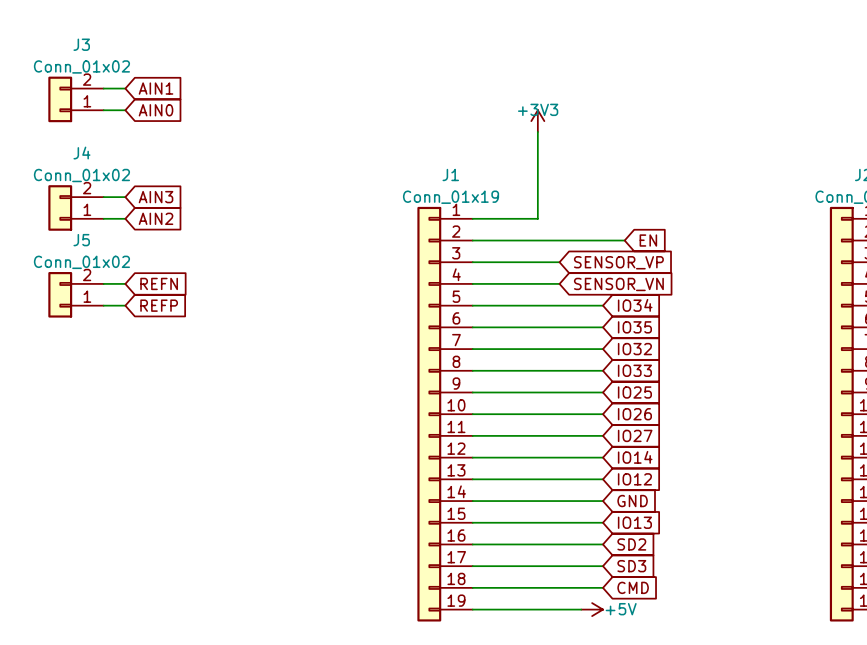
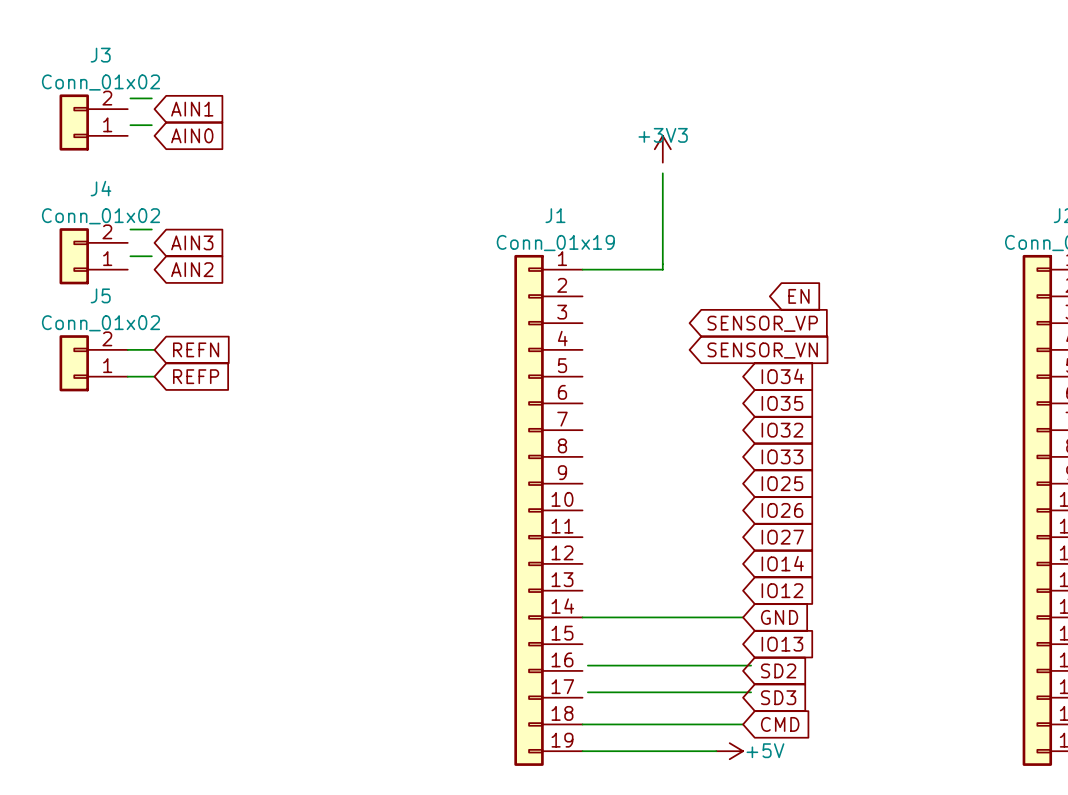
wire: none -> (130, 98) (151, 98)
wire: (103, 88) (125, 88) -> none
wire: none -> (130, 125) (151, 125)
wire: (103, 110) (125, 110) -> none
wire: (537, 131) (537, 140) -> none
wire: none -> (130, 229) (151, 229)
wire: (103, 197) (125, 197) -> none
wire: none -> (130, 256) (151, 256)
wire: (103, 218) (125, 218) -> none
wire: (472, 240) (624, 240) -> none
wire: (472, 262) (559, 262) -> none
wire: (472, 283) (559, 283) -> none
wire: (472, 305) (602, 305) -> none
wire: (472, 327) (602, 327) -> none
wire: (472, 349) (602, 349) -> none
wire: (472, 370) (602, 370) -> none
wire: (472, 392) (602, 392) -> none
wire: (472, 414) (602, 414) -> none
wire: (472, 435) (602, 435) -> none
wire: (472, 457) (602, 457) -> none
wire: (472, 479) (602, 479) -> none
wire: (472, 522) (602, 522) -> none
wire: none -> (587, 665) (751, 665)
wire: (472, 544) (602, 544) -> none
wire: none -> (587, 692) (751, 692)
wire: (472, 566) (602, 566) -> none

